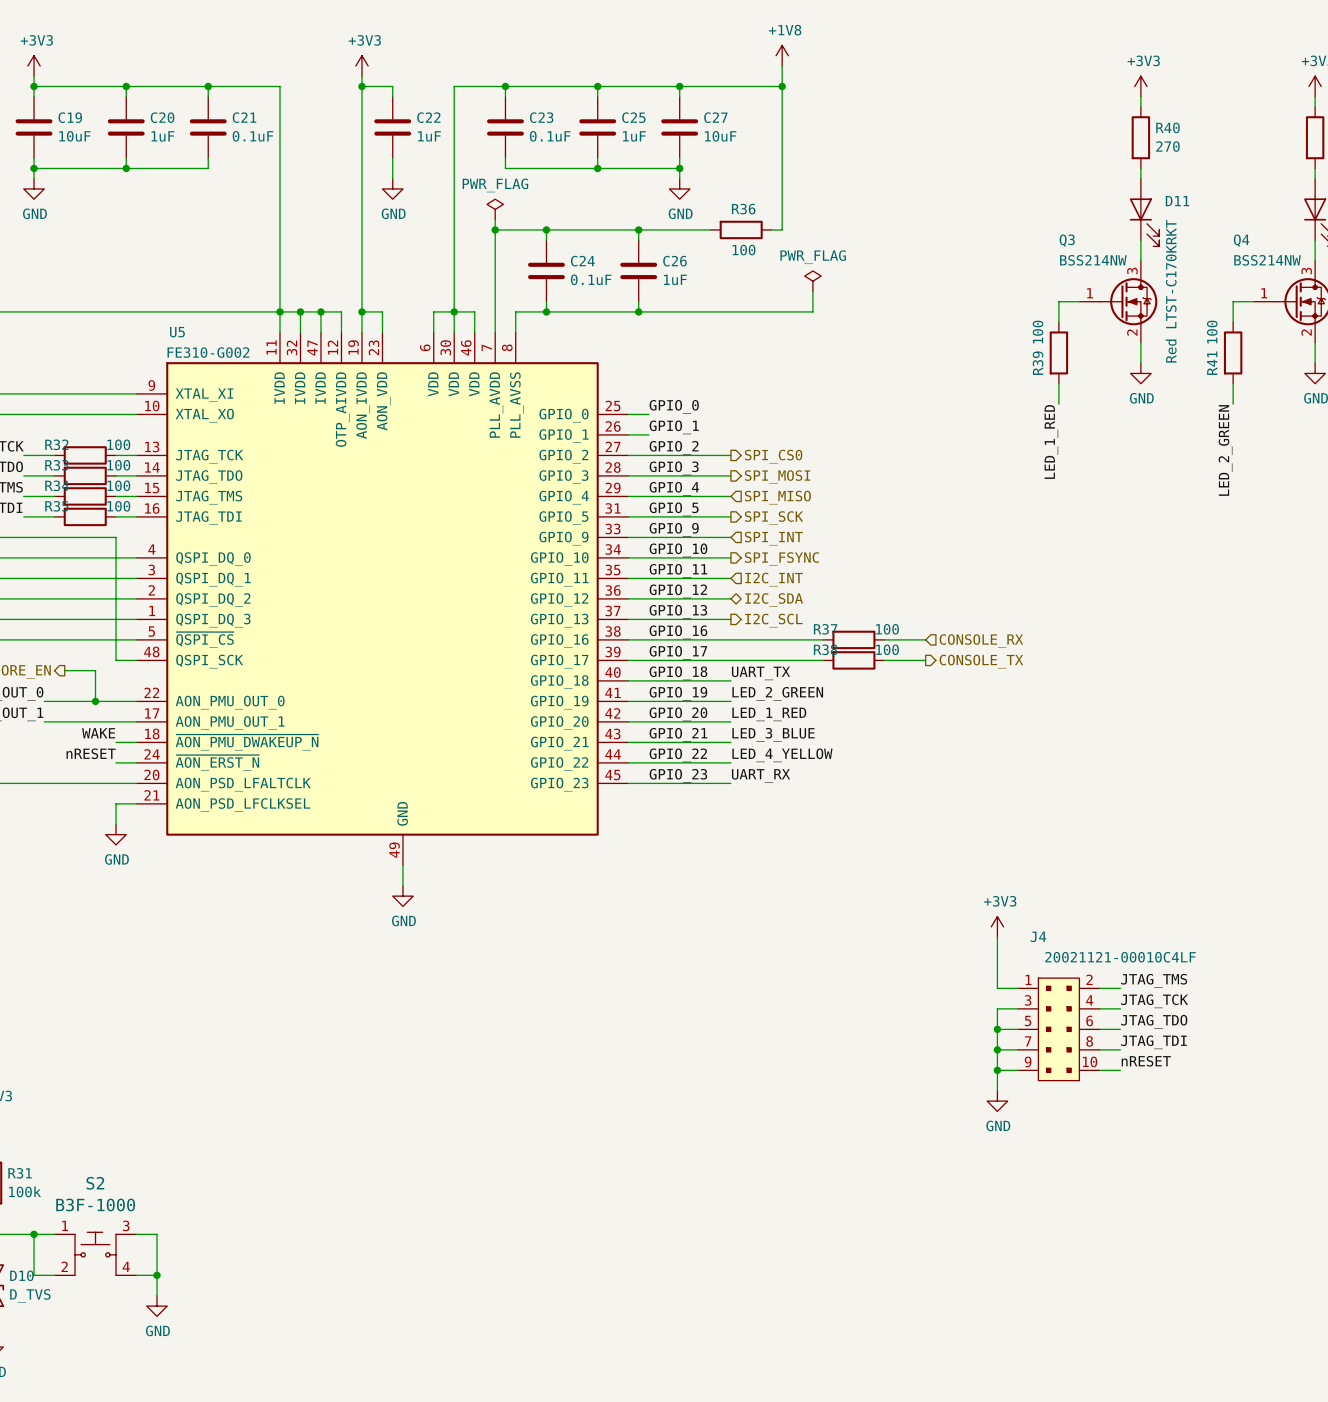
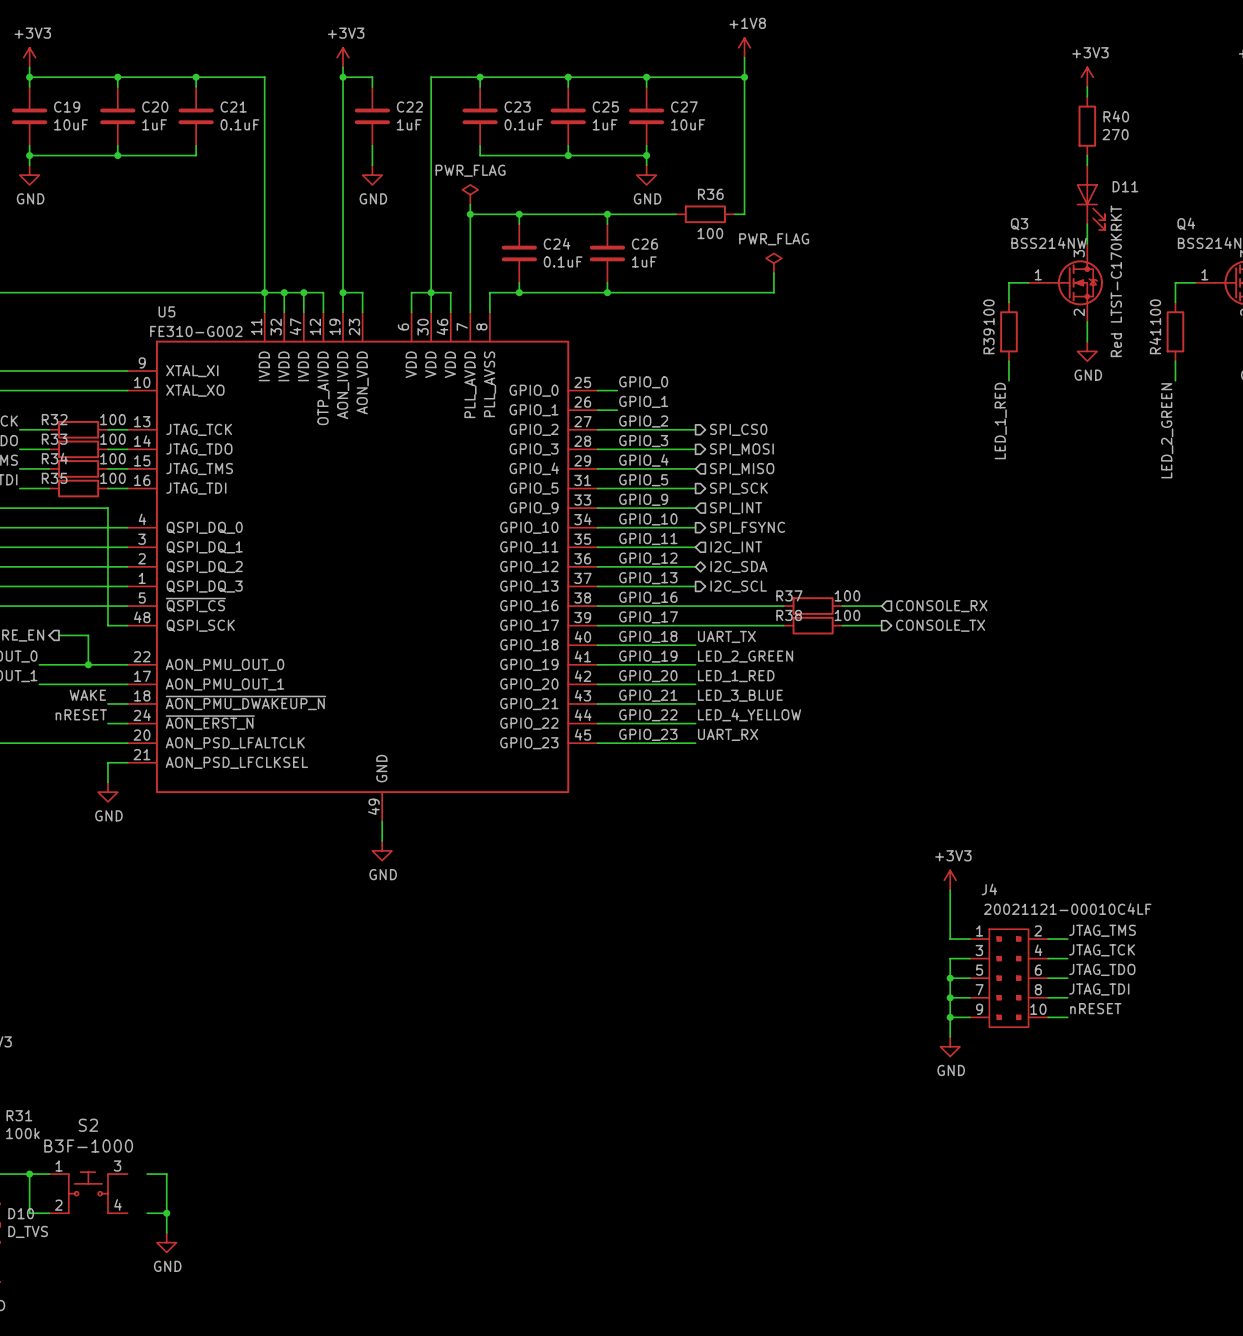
wire: (136, 1234) (157, 1234) (157, 1295) -> (147, 1174) (166, 1174) (166, 1232)
wire: (136, 1275) (157, 1275) -> (166, 1213) (147, 1213)
junction position: (157, 1275) -> (166, 1213)
power symbol position: GND (157, 1306) -> GND (166, 1242)

